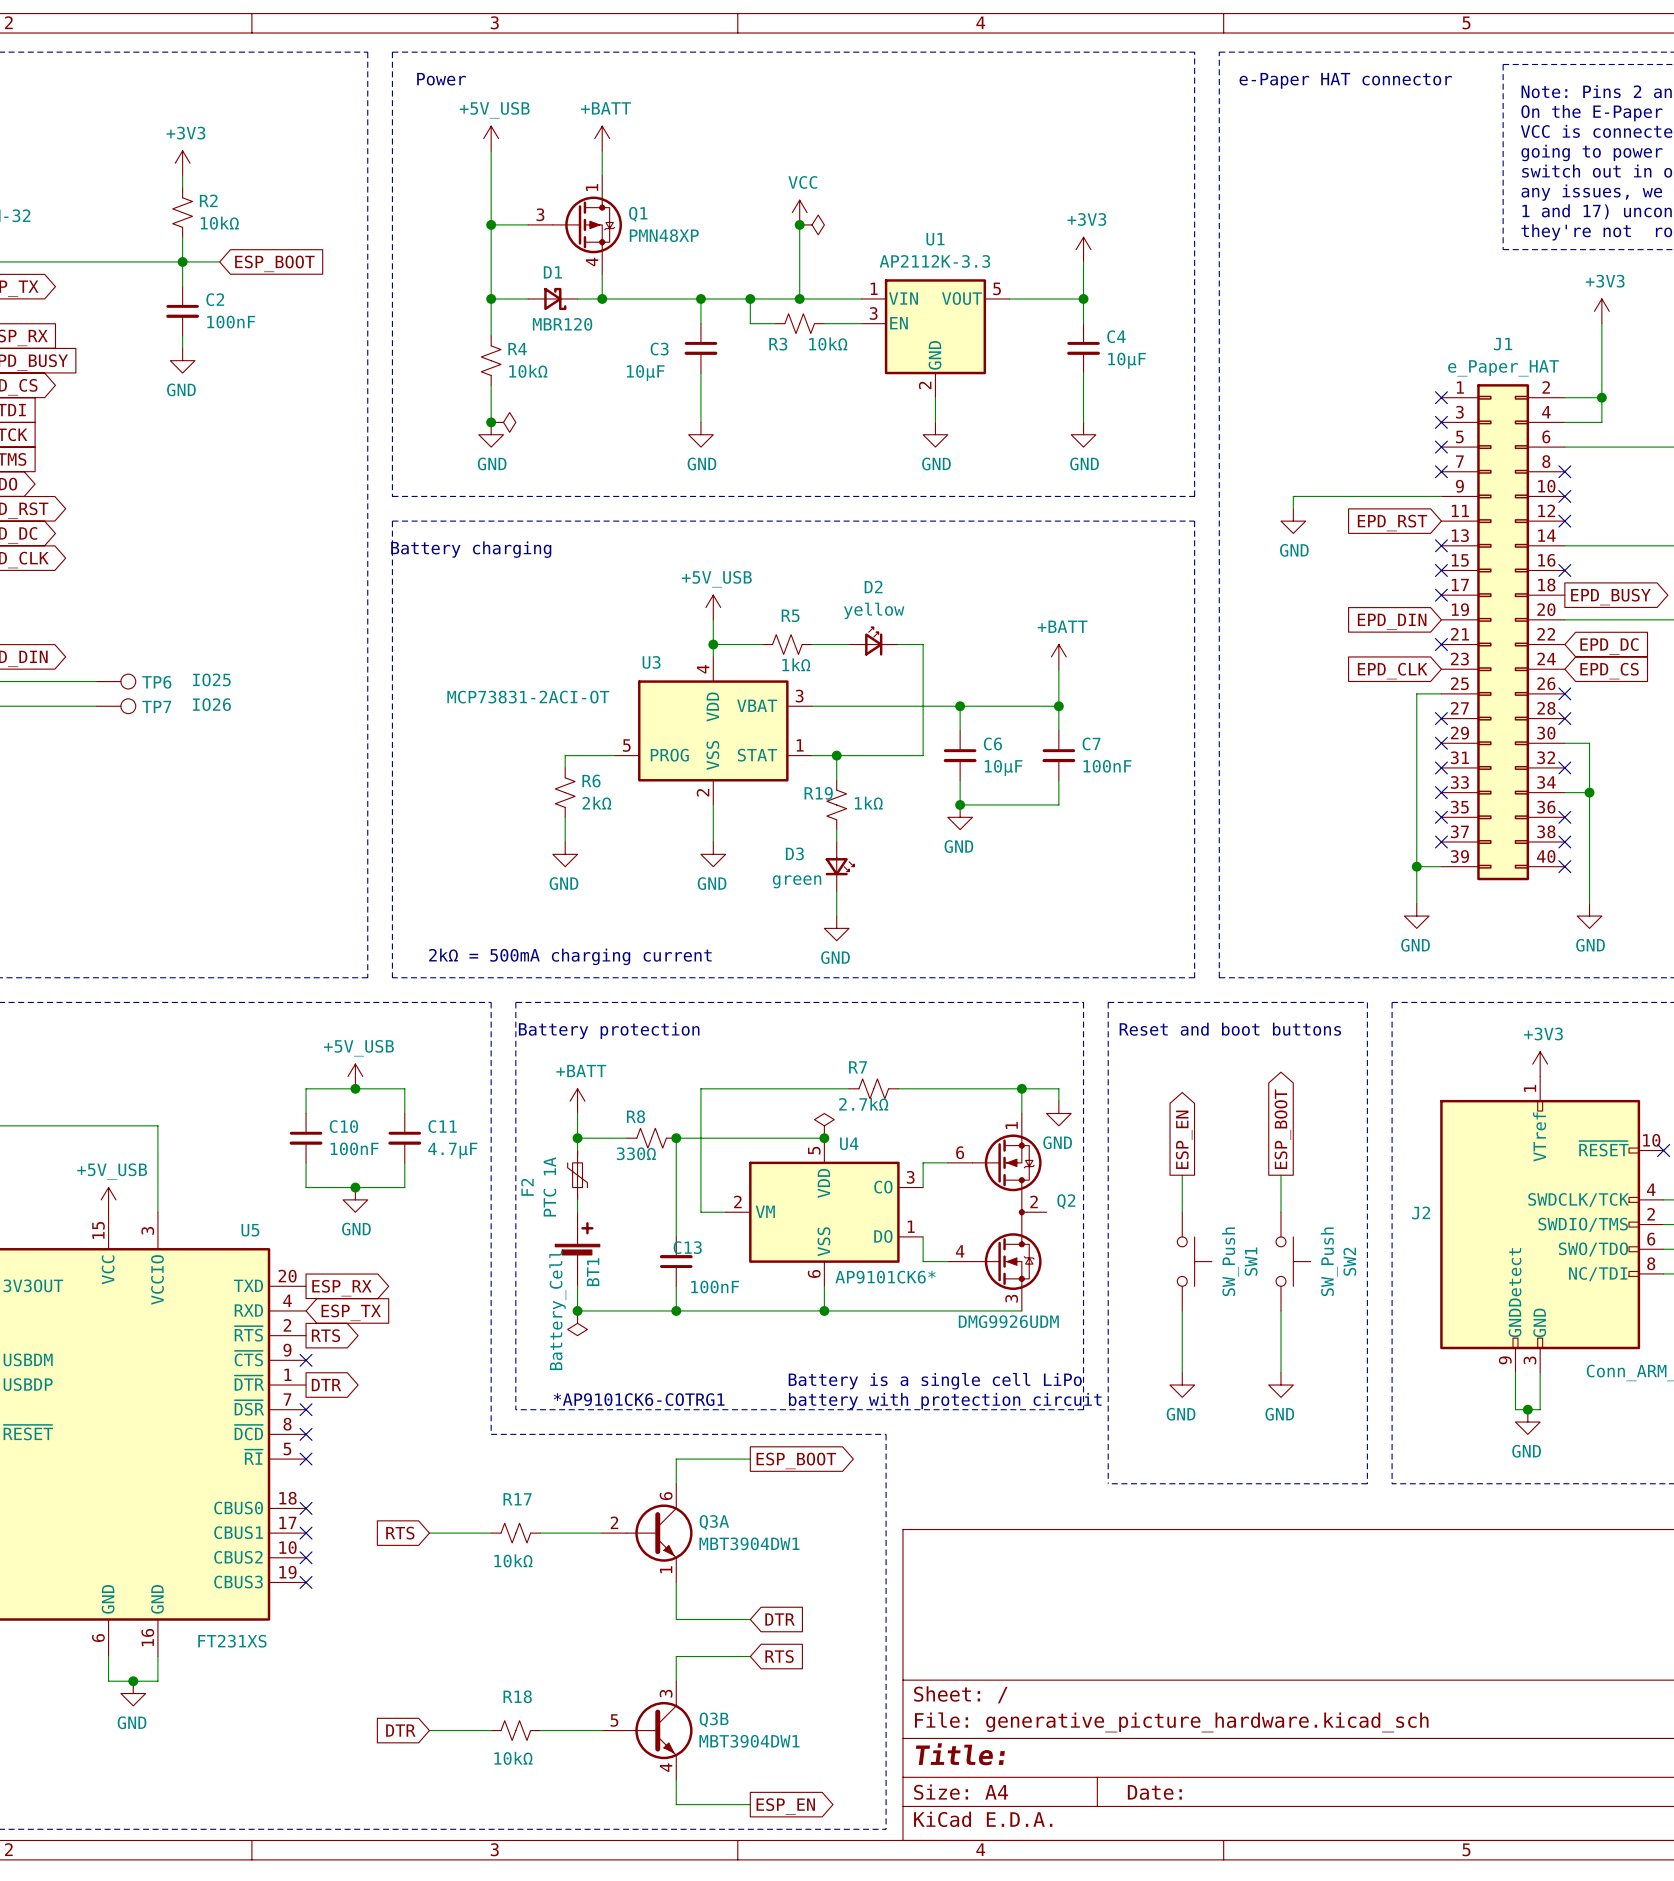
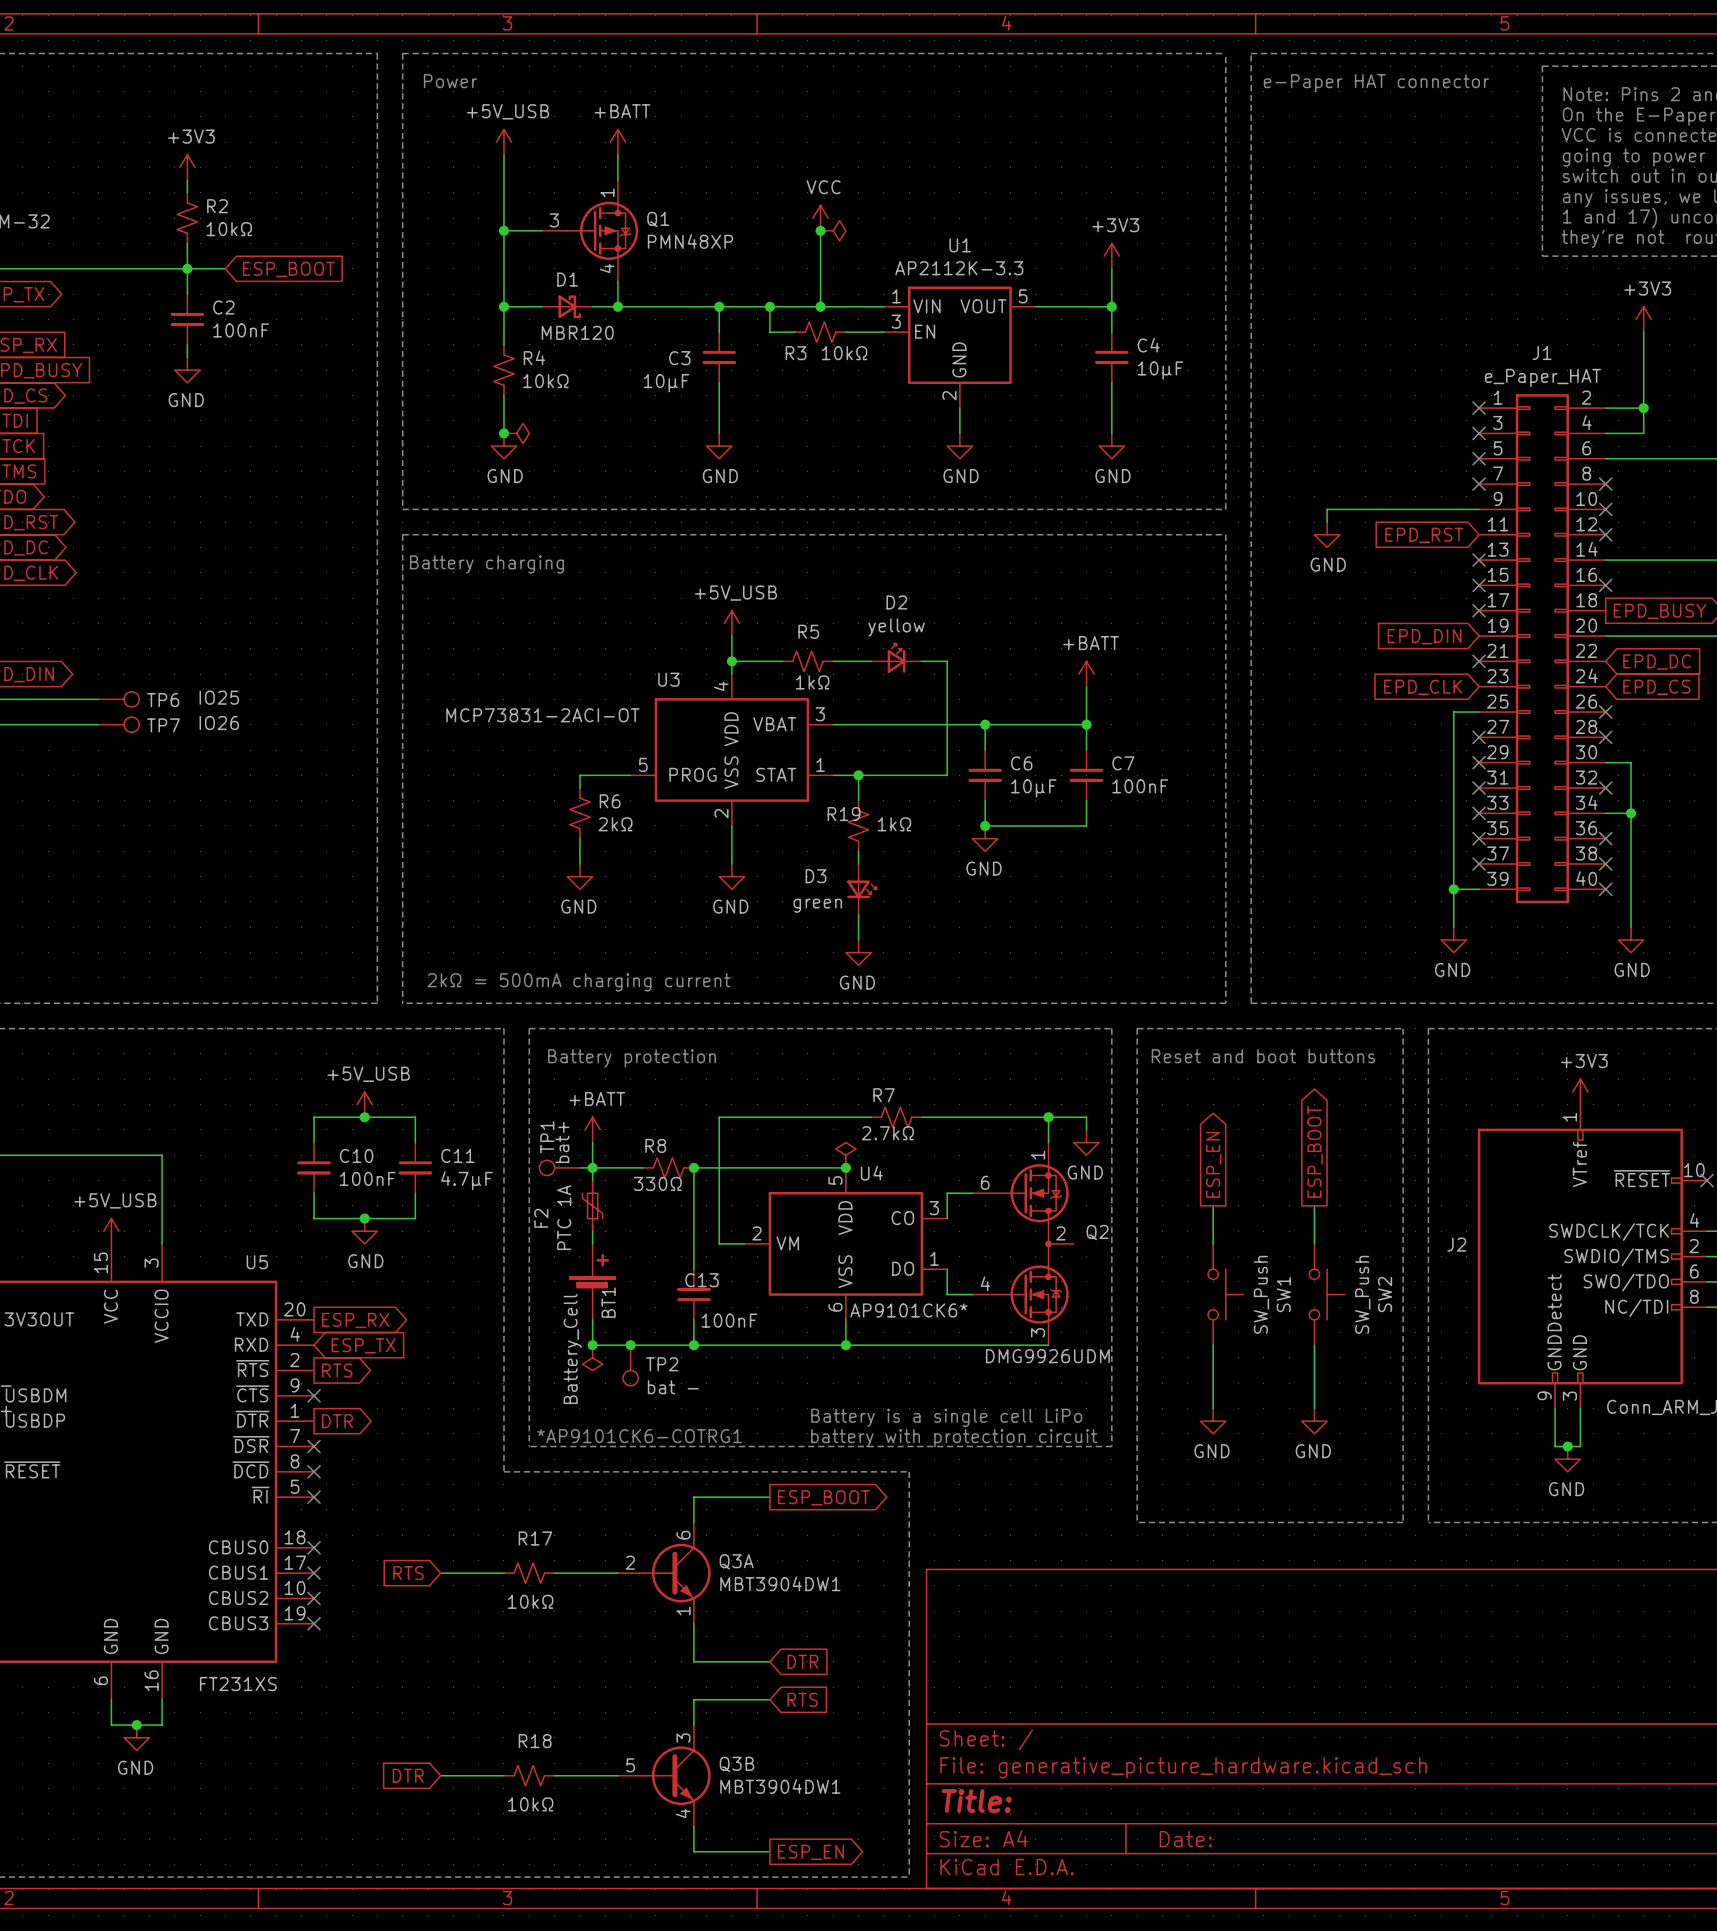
TP1: none -> bat+ (559, 1167)
wire: none -> (579, 1167) (592, 1167)
junction: none -> (630, 1345)
TP2: none -> bat - (630, 1365)

